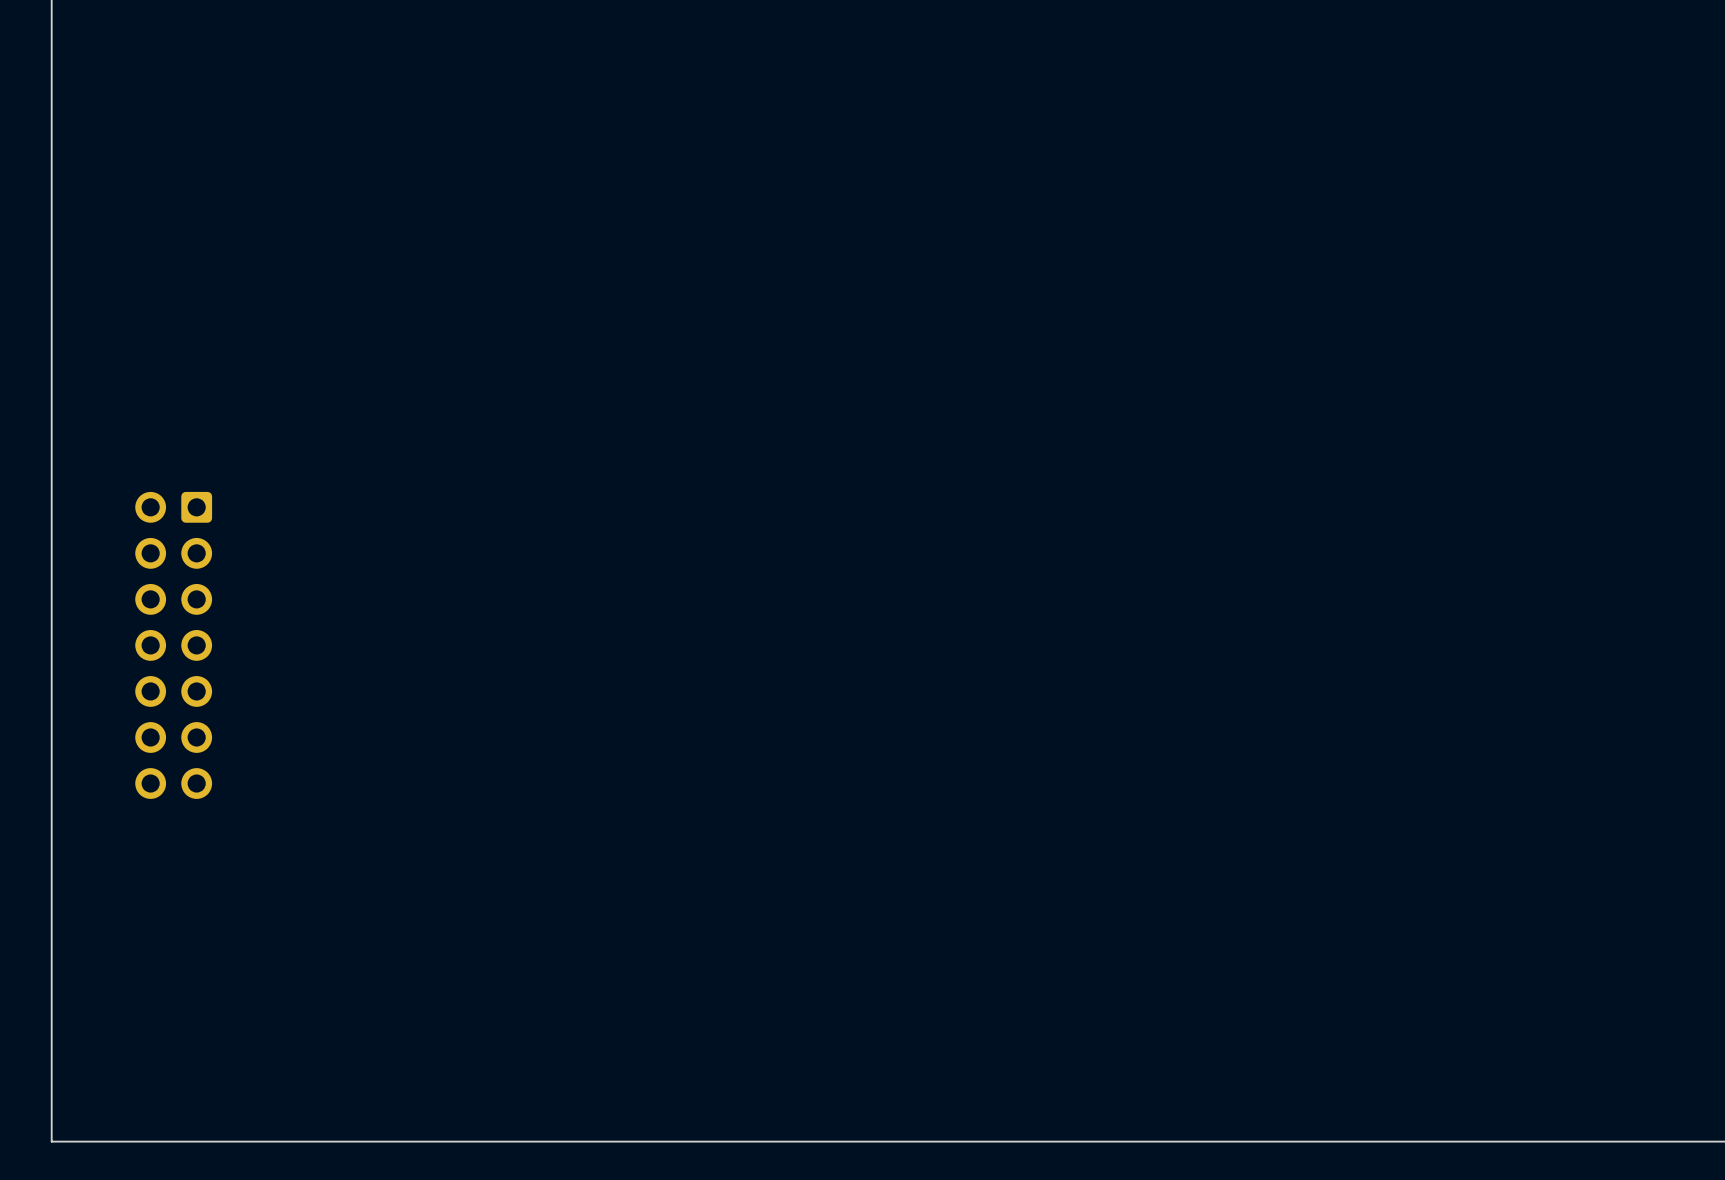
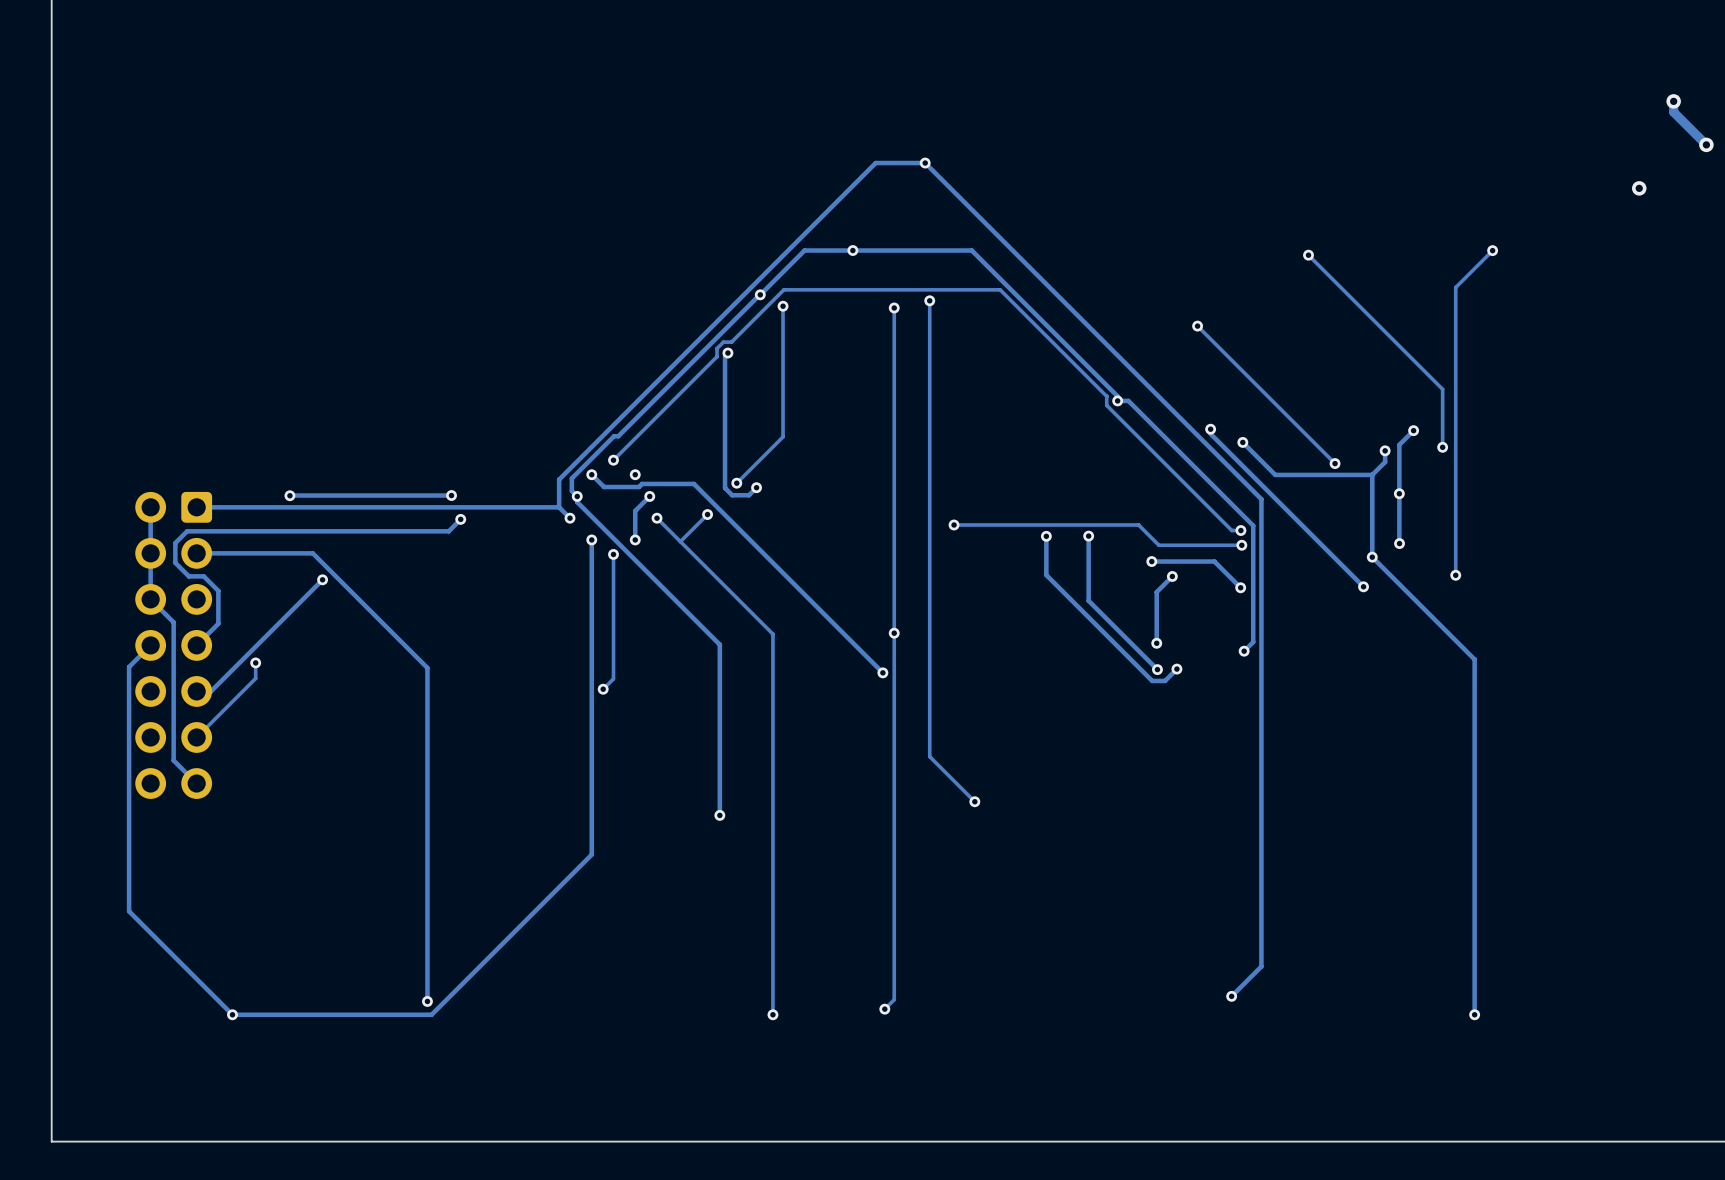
track: none -> (1673, 101) (1673, 112) (1706, 144)
via: none -> (1673, 101)
via: none -> (1706, 144)
via: none -> (925, 163)
via: none -> (1639, 188)
via: none -> (852, 250)
track: none -> (1492, 250) (1455, 287) (1455, 575)
via: none -> (1492, 250)
track: none -> (1308, 255) (1442, 389) (1442, 447)
via: none -> (1308, 255)
via: none -> (760, 294)
track: none -> (929, 300) (929, 756) (974, 801)
via: none -> (929, 300)
track: none -> (783, 306) (783, 436) (736, 483)
via: none -> (783, 306)
track: none -> (894, 307) (894, 999) (884, 1009)
via: none -> (894, 307)
track: none -> (1197, 326) (1335, 463)
via: none -> (1197, 326)
track: none -> (727, 353) (725, 355) (725, 488) (732, 495) (749, 495) (756, 487)
via: none -> (727, 353)
via: none -> (1117, 400)
track: none -> (1210, 429) (1210, 433) (1363, 586)
via: none -> (1210, 429)
track: none -> (1413, 430) (1399, 444) (1399, 543)
via: none -> (1413, 430)
track: none -> (1242, 442) (1275, 474) (1372, 474)
via: none -> (1242, 442)
via: none -> (1442, 447)
track: none -> (1385, 450) (1385, 462) (1372, 474)
via: none -> (1385, 450)
track: none -> (613, 460) (717, 356) (717, 348) (723, 342) (731, 342) (783, 289) (1000, 289) (1106, 396) (1106, 405) (1231, 530) (1240, 530)
via: none -> (613, 460)
via: none -> (1335, 463)
track: none -> (591, 474) (604, 487) (639, 487) (642, 483) (693, 483) (882, 672)
via: none -> (591, 474)
via: none -> (635, 474)
track: none -> (1372, 474) (1372, 557) (1474, 659) (1474, 1014)
via: none -> (736, 483)
via: none -> (756, 487)
via: none -> (1399, 493)
via: none -> (289, 495)
track: none -> (451, 495) (290, 495)
via: none -> (451, 495)
via: none -> (577, 496)
track: none -> (649, 496) (635, 510) (635, 539)
via: none -> (649, 496)
track: none -> (150, 507) (150, 599) (173, 622) (173, 760) (196, 783)
track: none -> (559, 507) (196, 507)
track: none -> (559, 507) (570, 518)
track: none -> (559, 507) (559, 479) (875, 163) (925, 163) (1261, 499) (1261, 966) (1231, 996)
track: none -> (707, 514) (680, 541)
via: none -> (707, 514)
via: none -> (570, 518)
track: none -> (657, 518) (772, 634) (772, 1014)
via: none -> (657, 518)
track: none -> (460, 519) (448, 531) (187, 531) (175, 543) (175, 562) (188, 576) (203, 576) (218, 590) (218, 623) (196, 645)
via: none -> (460, 519)
track: none -> (954, 525) (1138, 525) (1158, 545) (1241, 545)
via: none -> (954, 525)
via: none -> (1240, 530)
track: none -> (1046, 536) (1046, 575) (1152, 680) (1165, 680) (1176, 669)
via: none -> (1046, 536)
track: none -> (1088, 536) (1088, 600) (1157, 669)
via: none -> (1088, 536)
track: none -> (591, 539) (591, 854) (431, 1014) (232, 1014) (129, 911) (129, 667) (150, 645)
via: none -> (591, 539)
via: none -> (635, 539)
via: none -> (1399, 543)
via: none -> (1241, 545)
track: none -> (196, 553) (312, 553) (427, 667) (427, 1001)
track: none -> (613, 554) (613, 678) (603, 689)
via: none -> (613, 554)
via: none -> (1372, 557)
track: none -> (1151, 561) (1214, 561) (1240, 587)
via: none -> (1151, 561)
via: none -> (1455, 575)
track: none -> (1172, 576) (1156, 592) (1156, 643)
via: none -> (1172, 576)
track: none -> (322, 579) (210, 691) (196, 691)
via: none -> (322, 579)
via: none -> (1363, 586)
via: none -> (1240, 587)
via: none -> (894, 633)
via: none -> (1156, 643)
track: none -> (1244, 651) (1253, 642) (1253, 525) (1128, 400) (1117, 400) (1117, 396) (971, 250) (804, 250) (618, 436) (614, 436) (571, 478) (571, 491) (577, 496) (577, 502) (719, 644) (719, 815)
via: none -> (1244, 651)
track: none -> (255, 662) (255, 678) (196, 737)
via: none -> (255, 662)
via: none -> (1157, 669)
via: none -> (1176, 669)
via: none -> (882, 672)
via: none -> (603, 689)
via: none -> (974, 801)
via: none -> (719, 815)
via: none -> (1231, 996)
via: none -> (427, 1001)
via: none -> (884, 1009)
via: none -> (232, 1014)
via: none -> (772, 1014)
via: none -> (1474, 1014)

